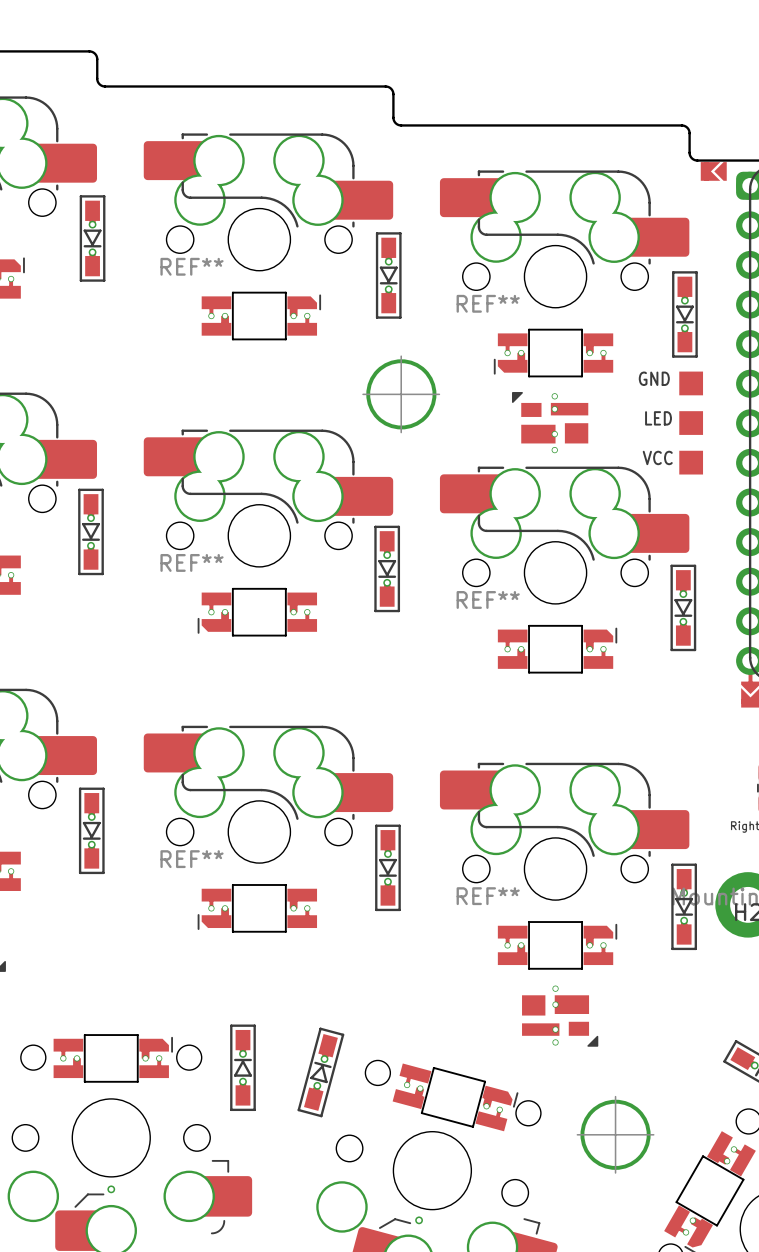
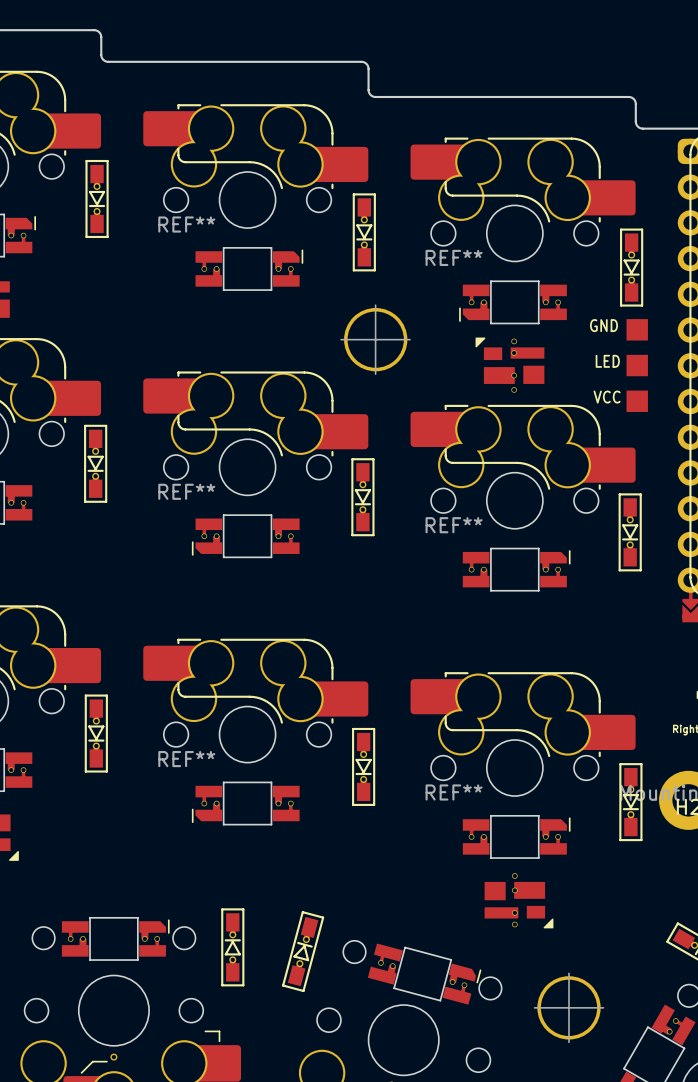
part: (713, 171) -> none

